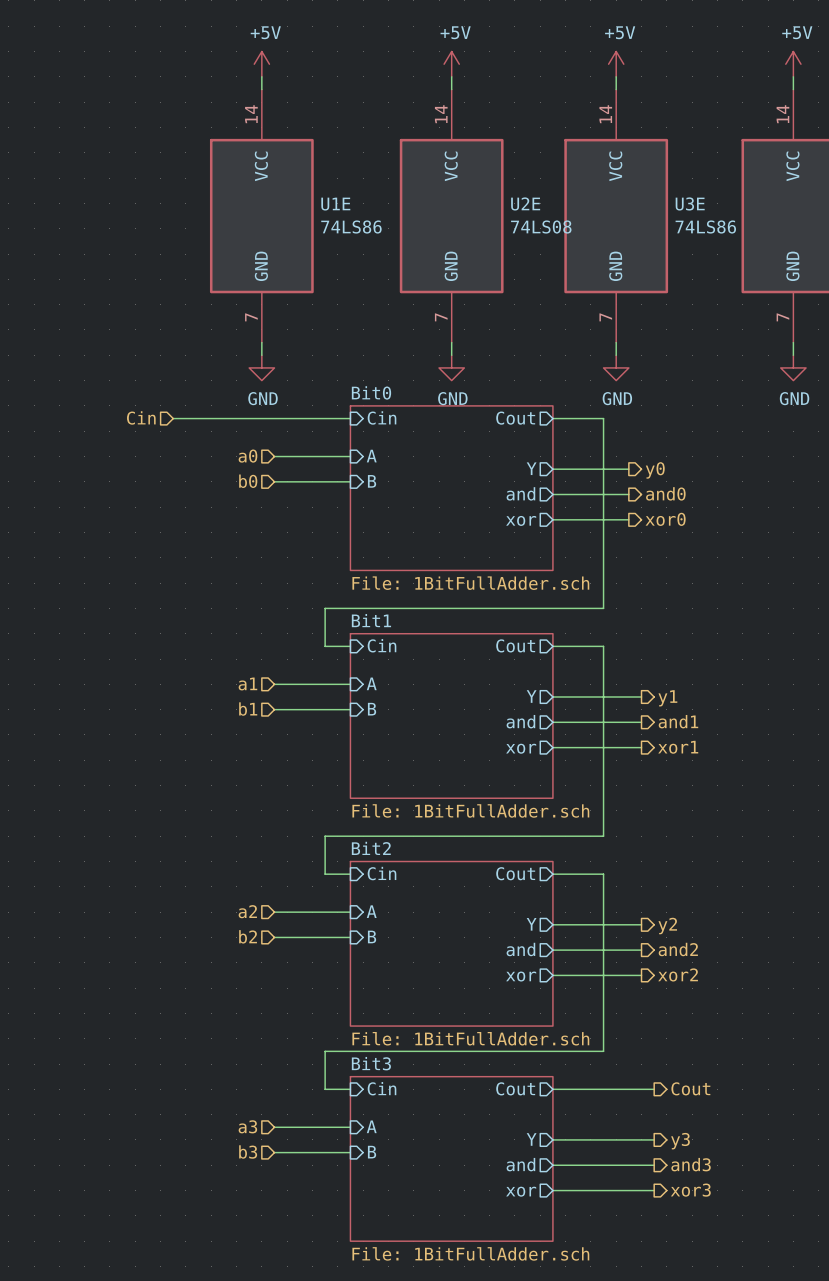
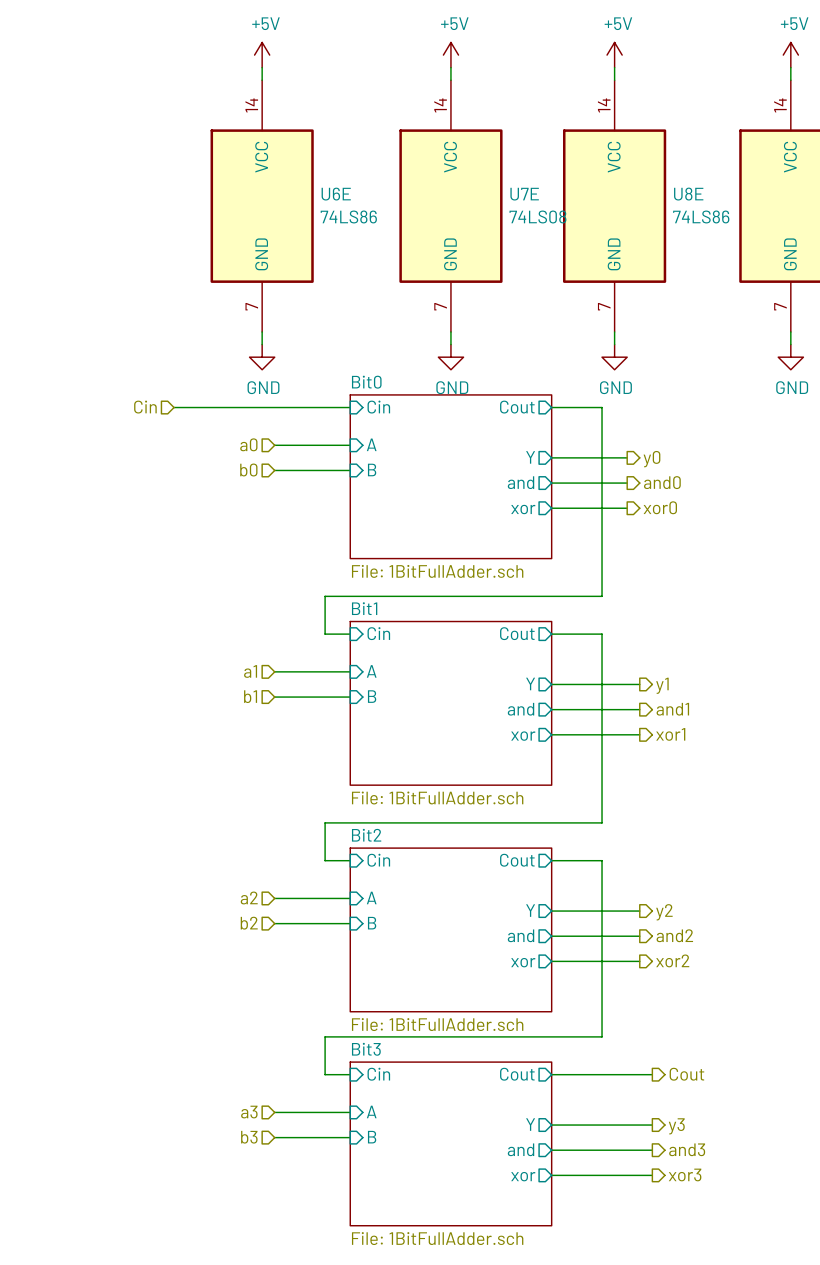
U2E name: U2E (525, 203) -> U7E (524, 194)
U3E name: U3E (690, 203) -> U8E (688, 194)
U1E name: U1E (335, 204) -> U6E (336, 194)

